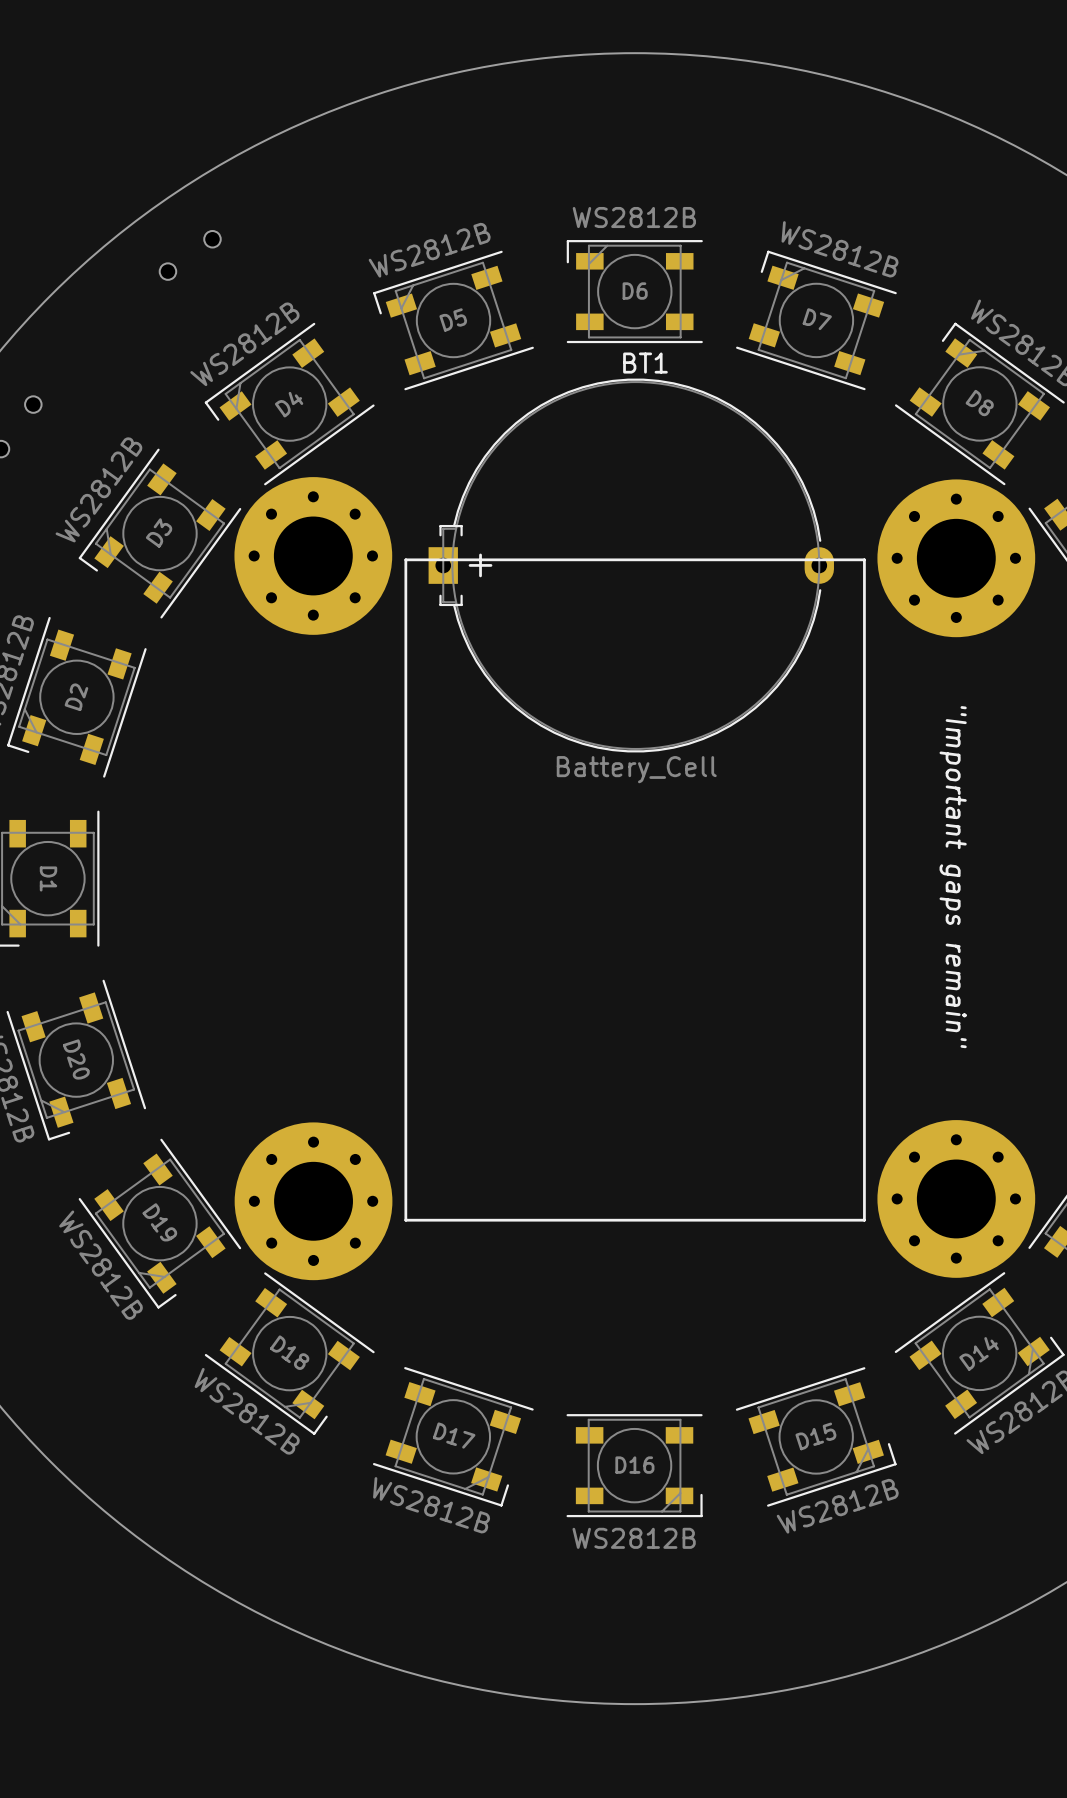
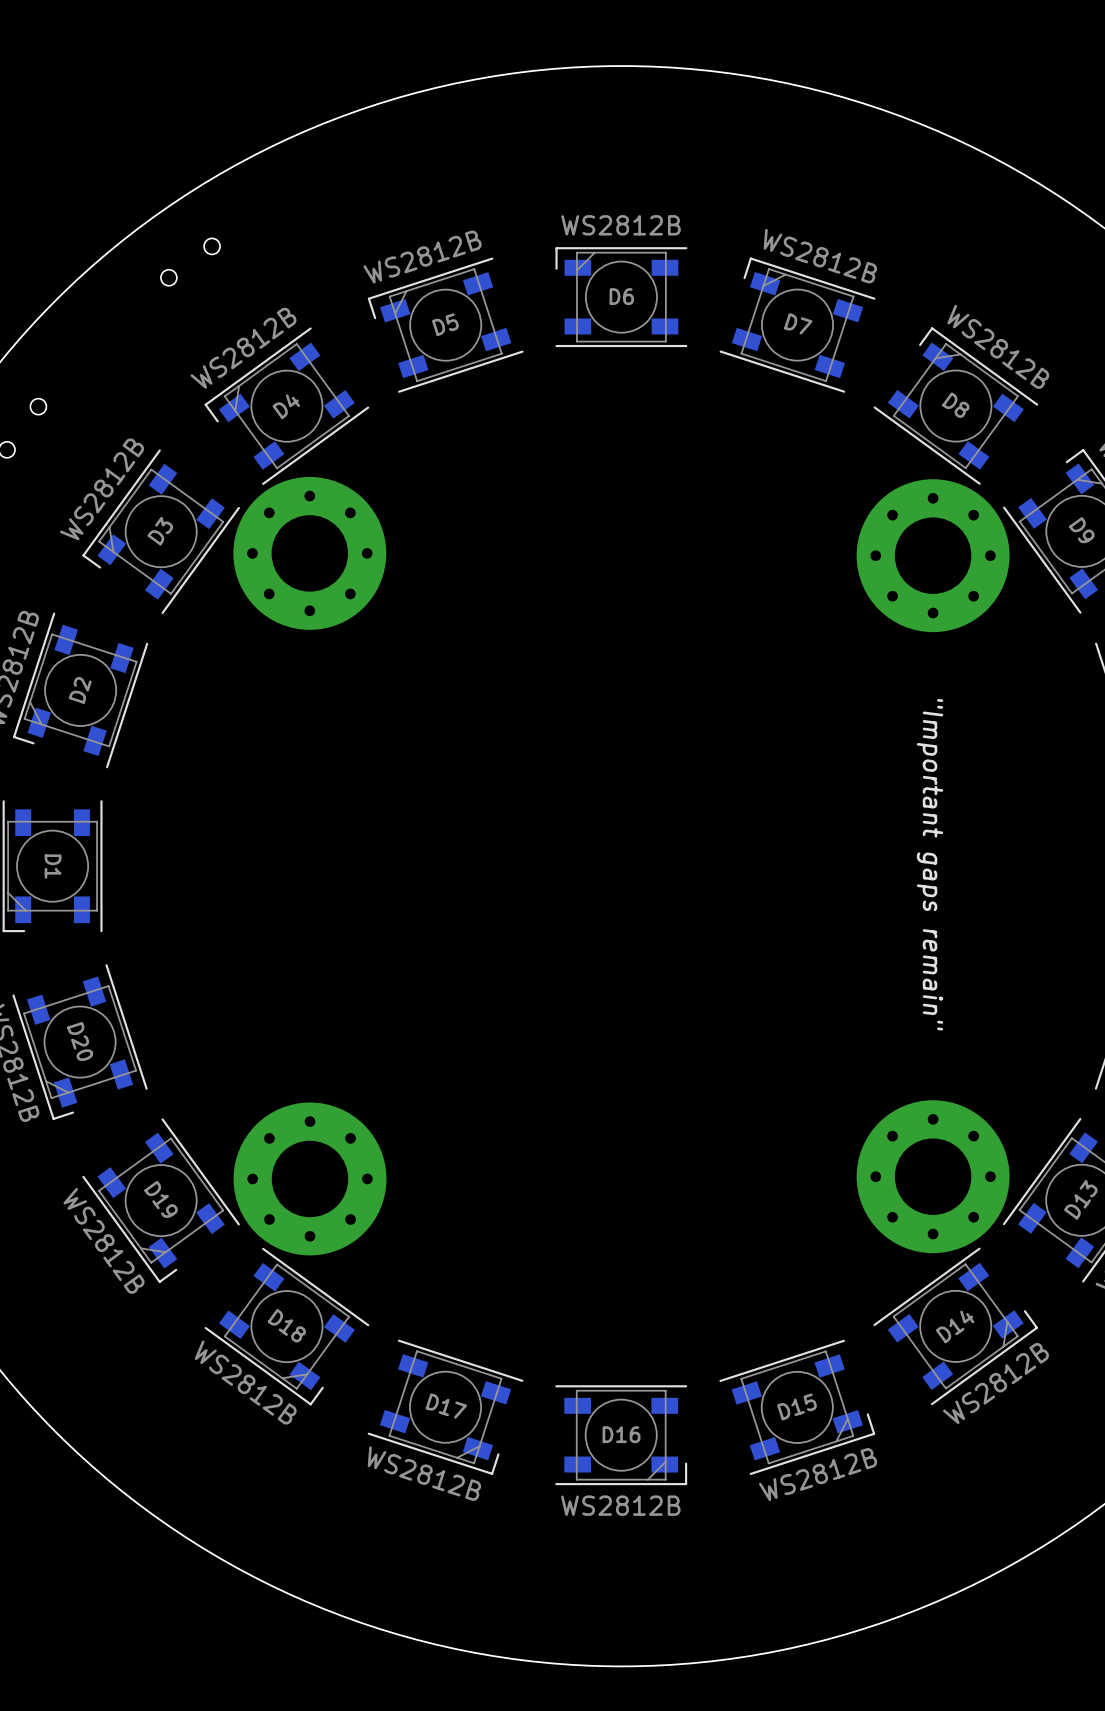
line: (864, 559) (405, 559) (405, 1220) (864, 1220) (864, 559) -> none
BT1: Battery_Cell (631, 565) -> none

